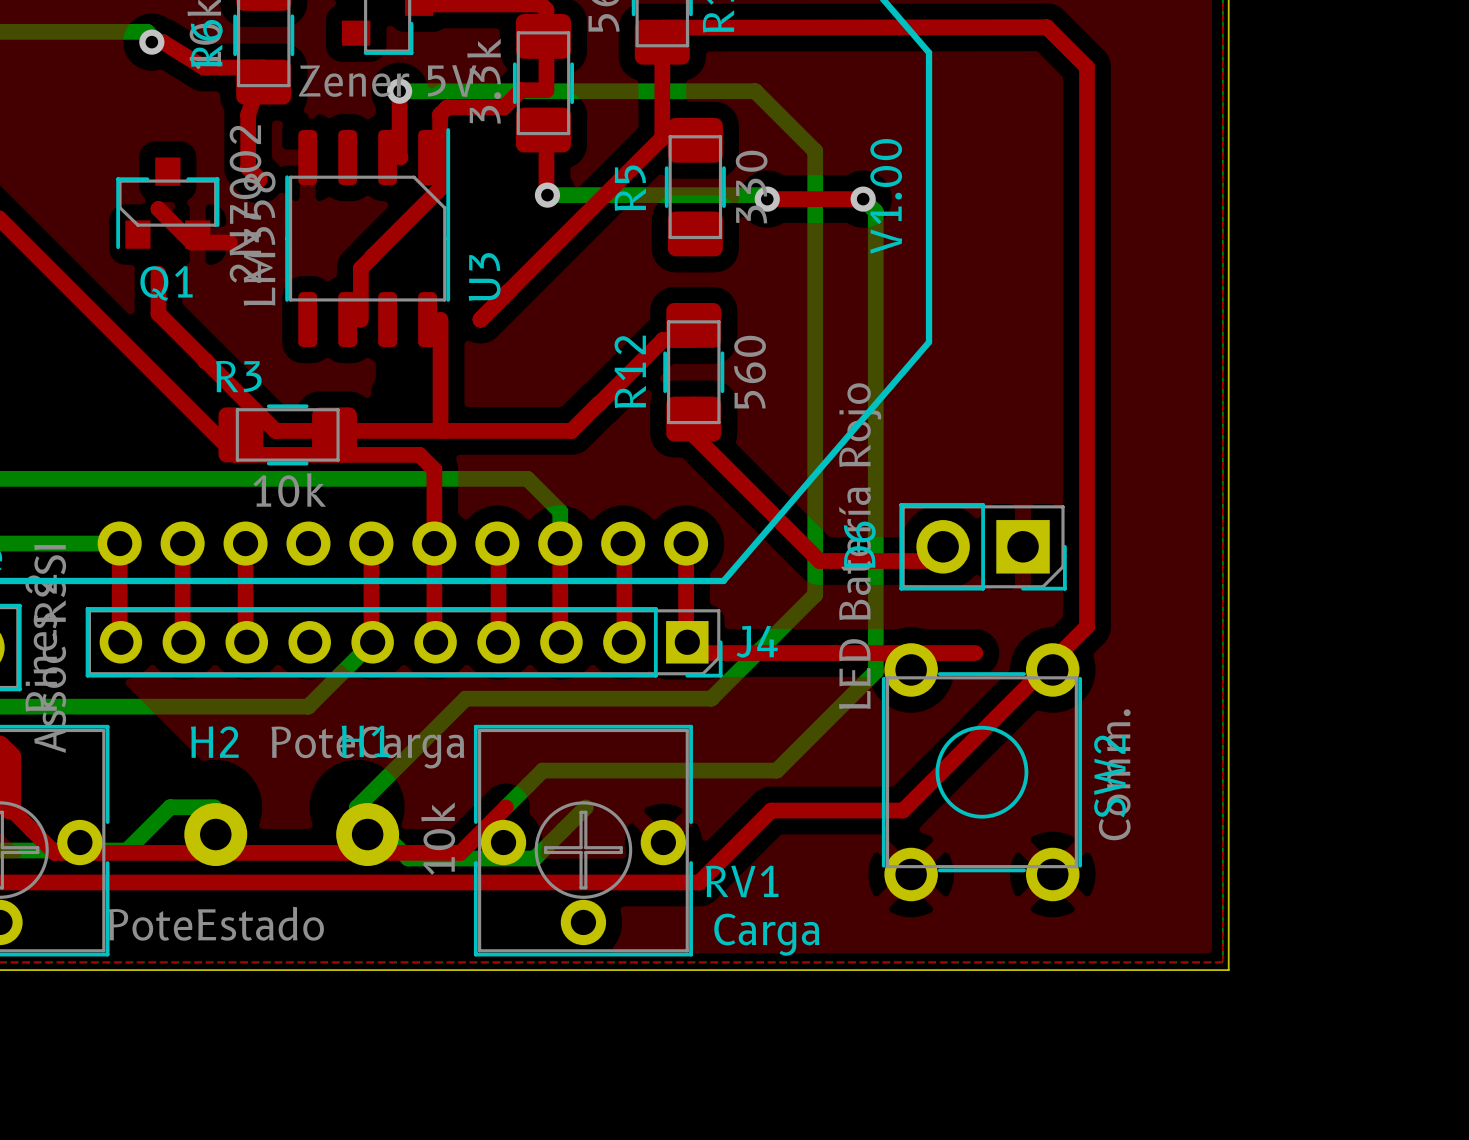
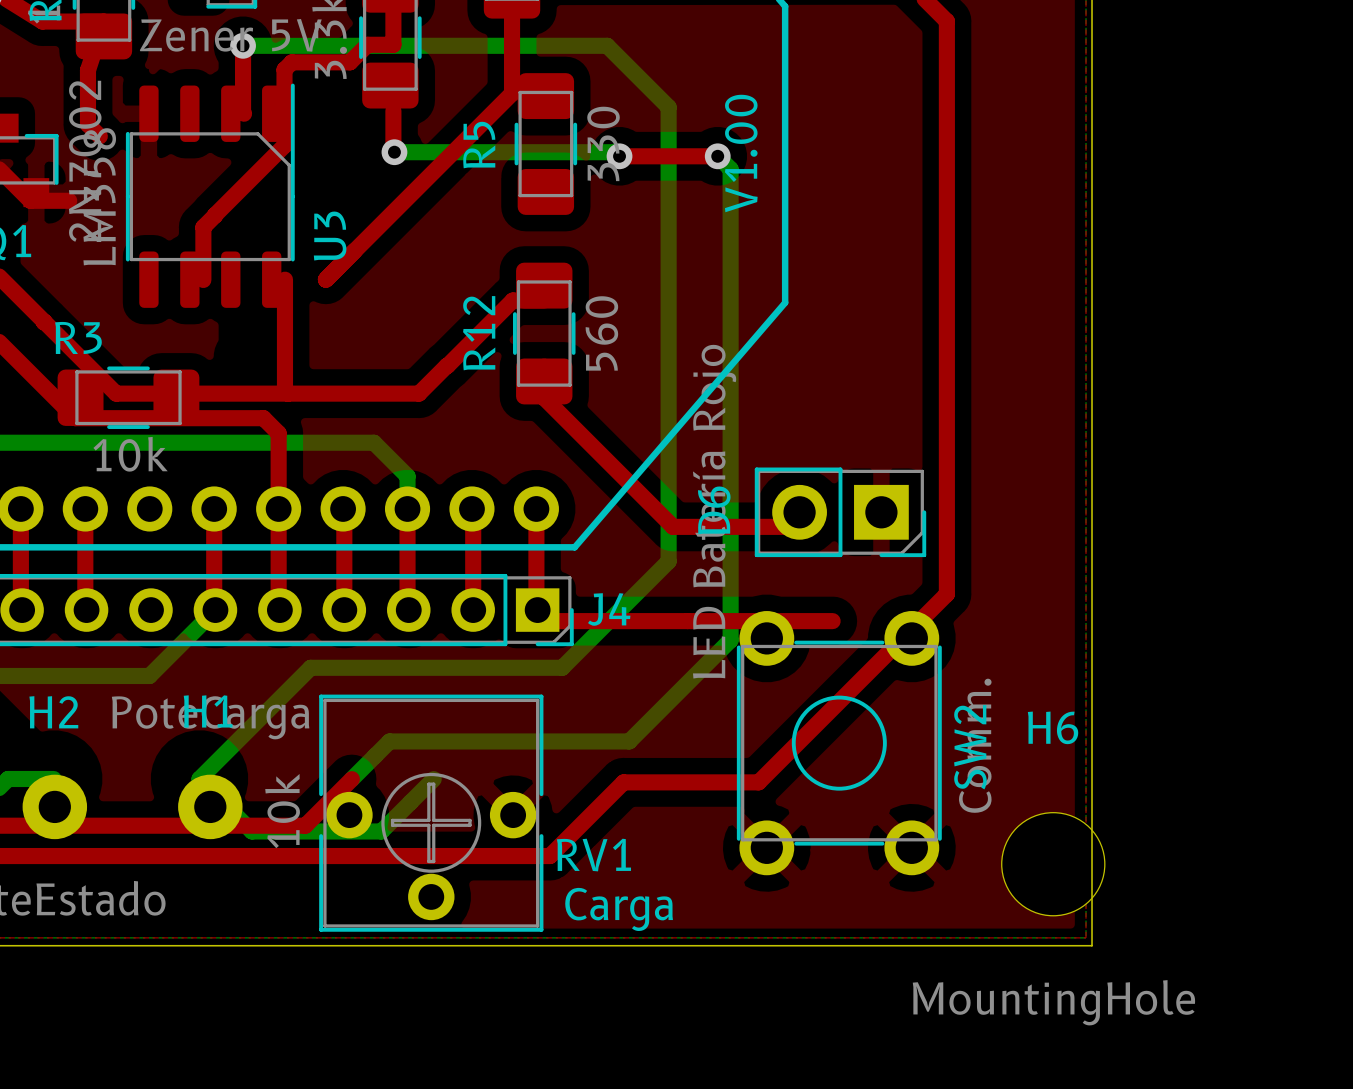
H6: none -> MountingHole (1053, 864)

